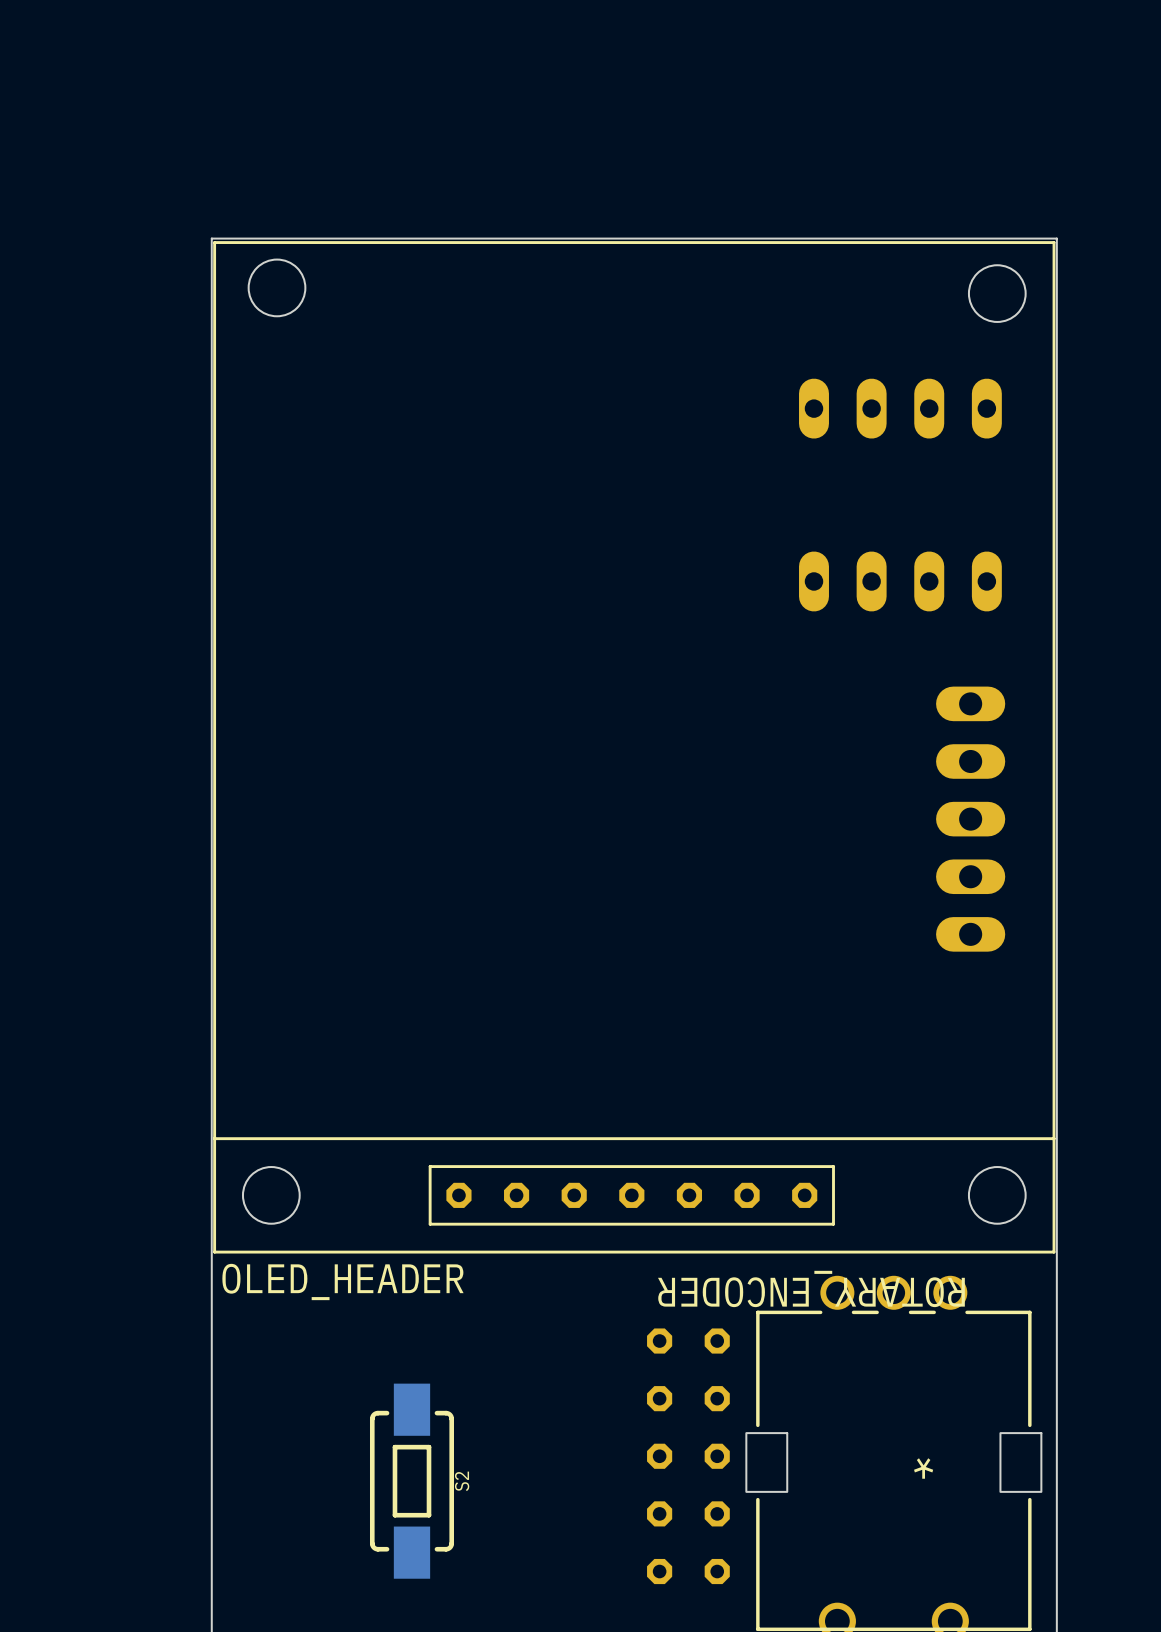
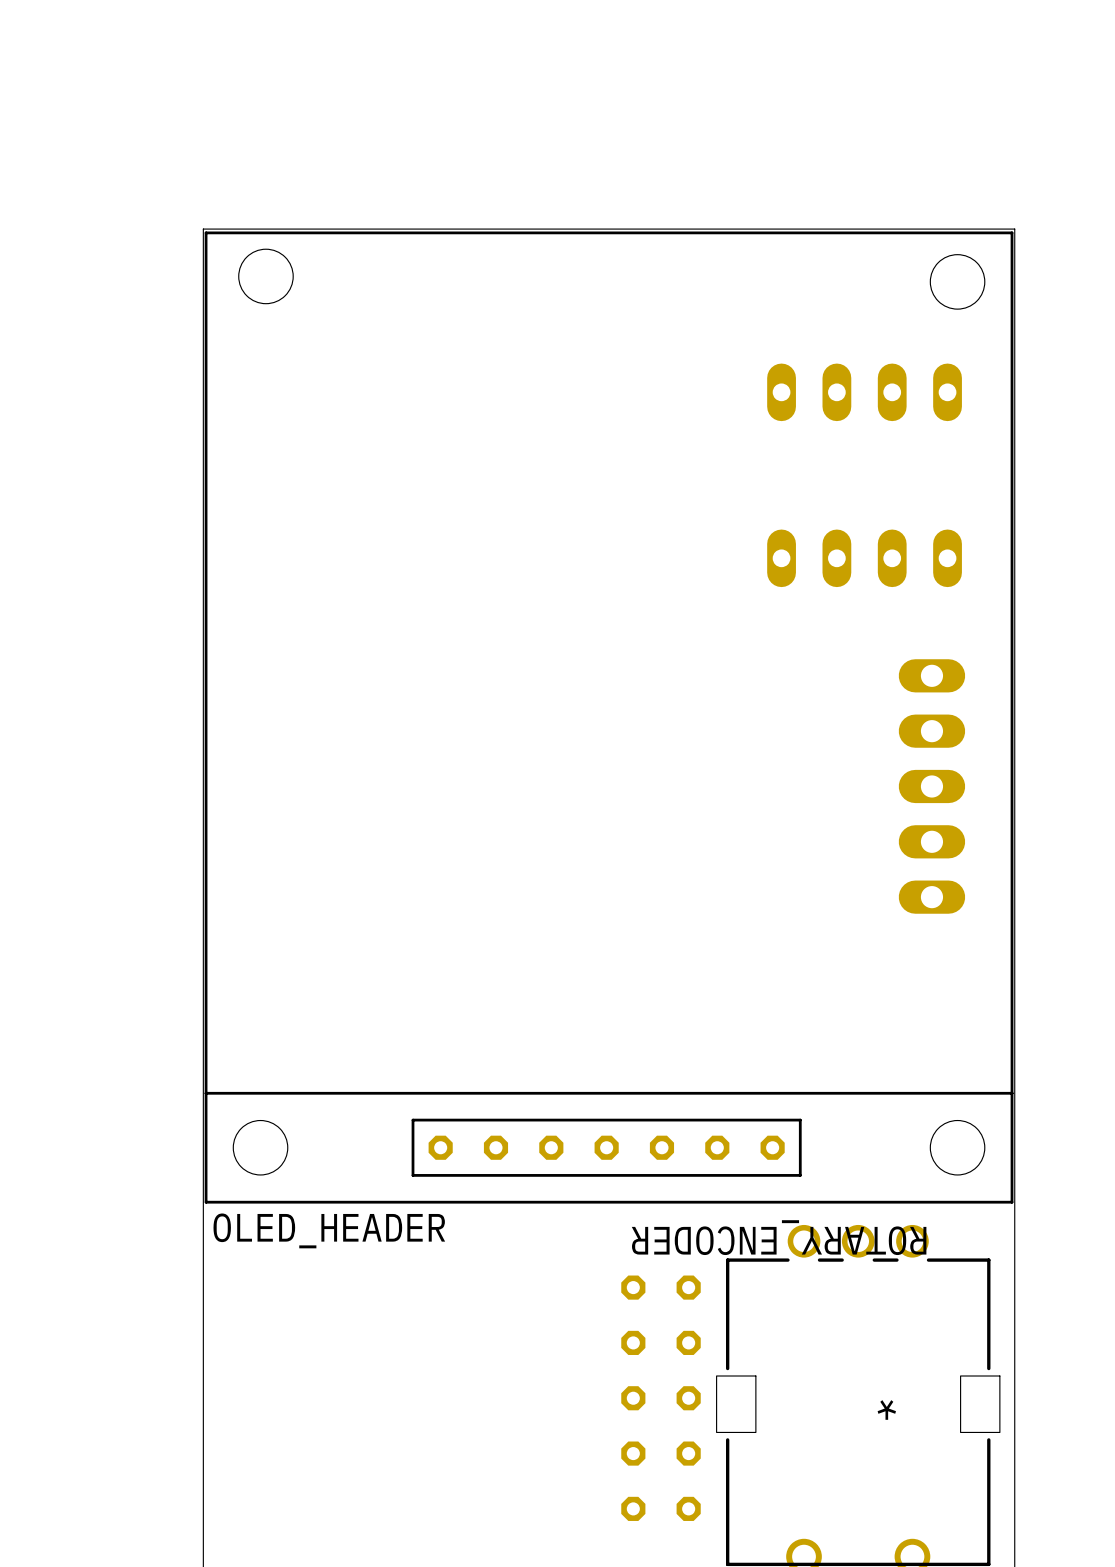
S2: (411, 1481) -> none

